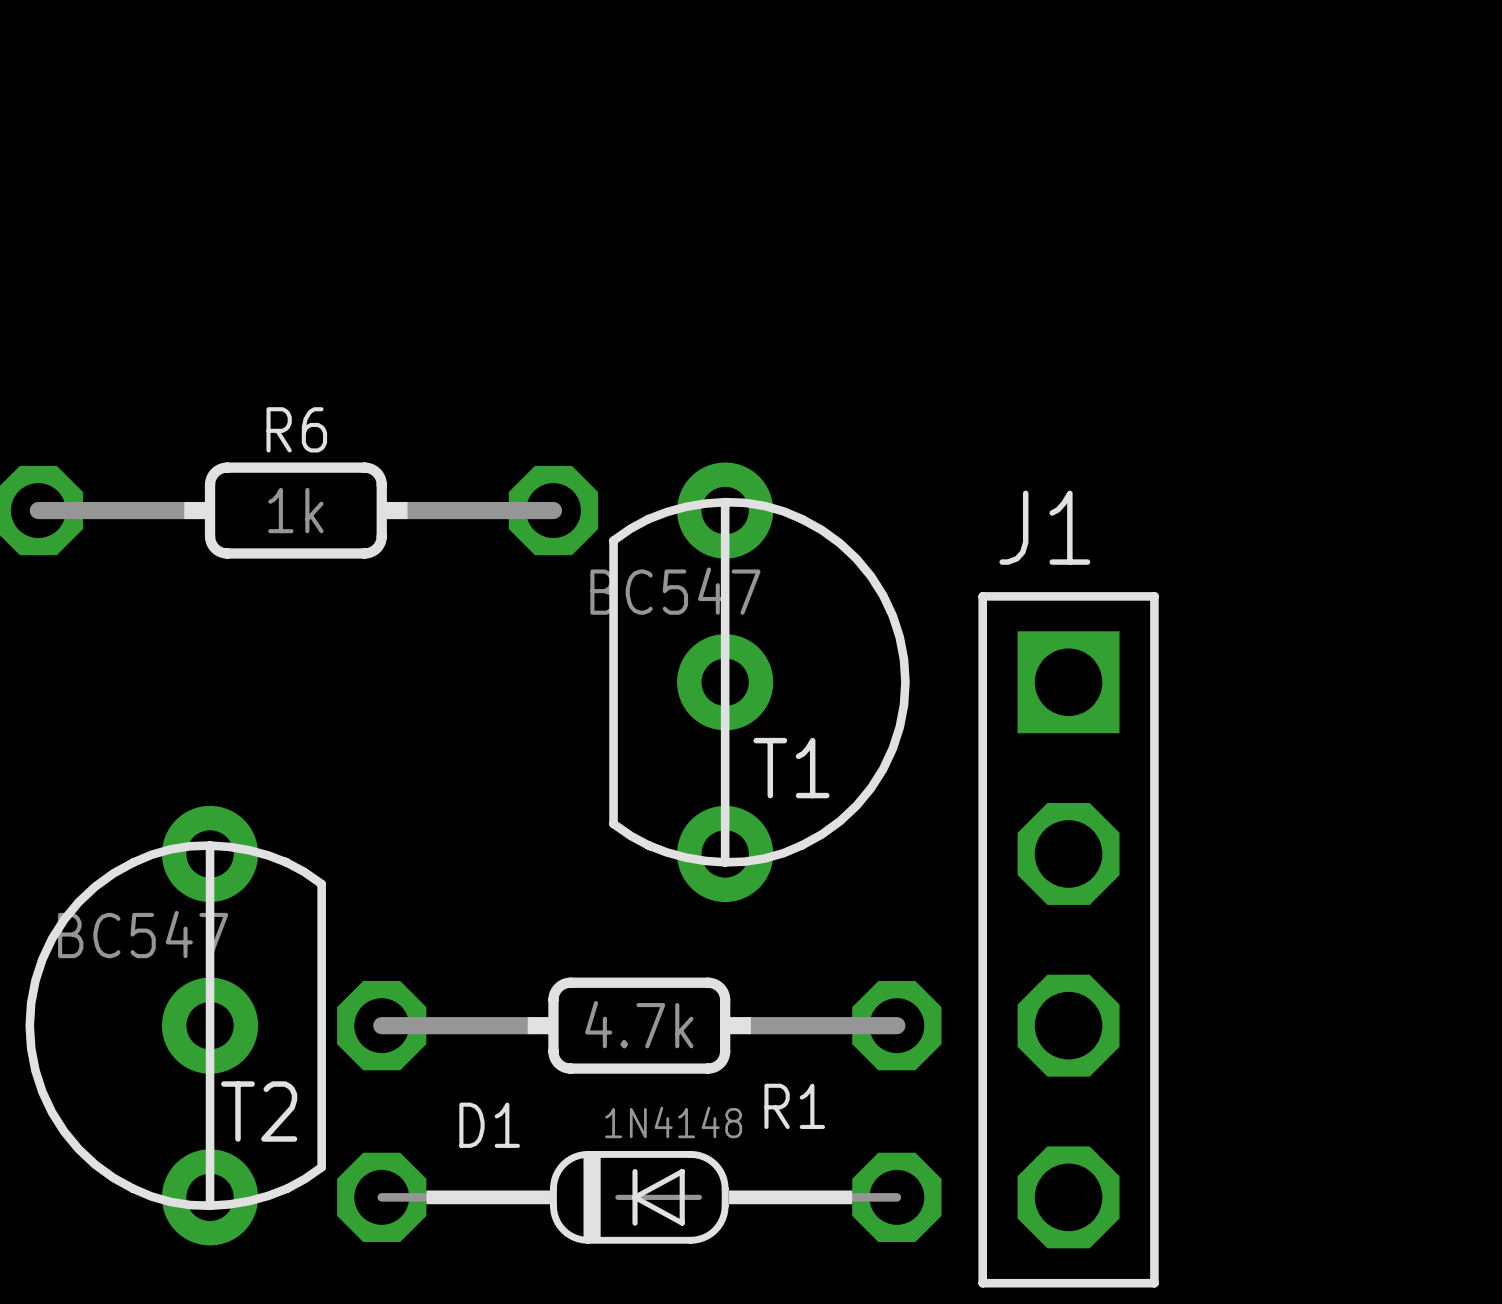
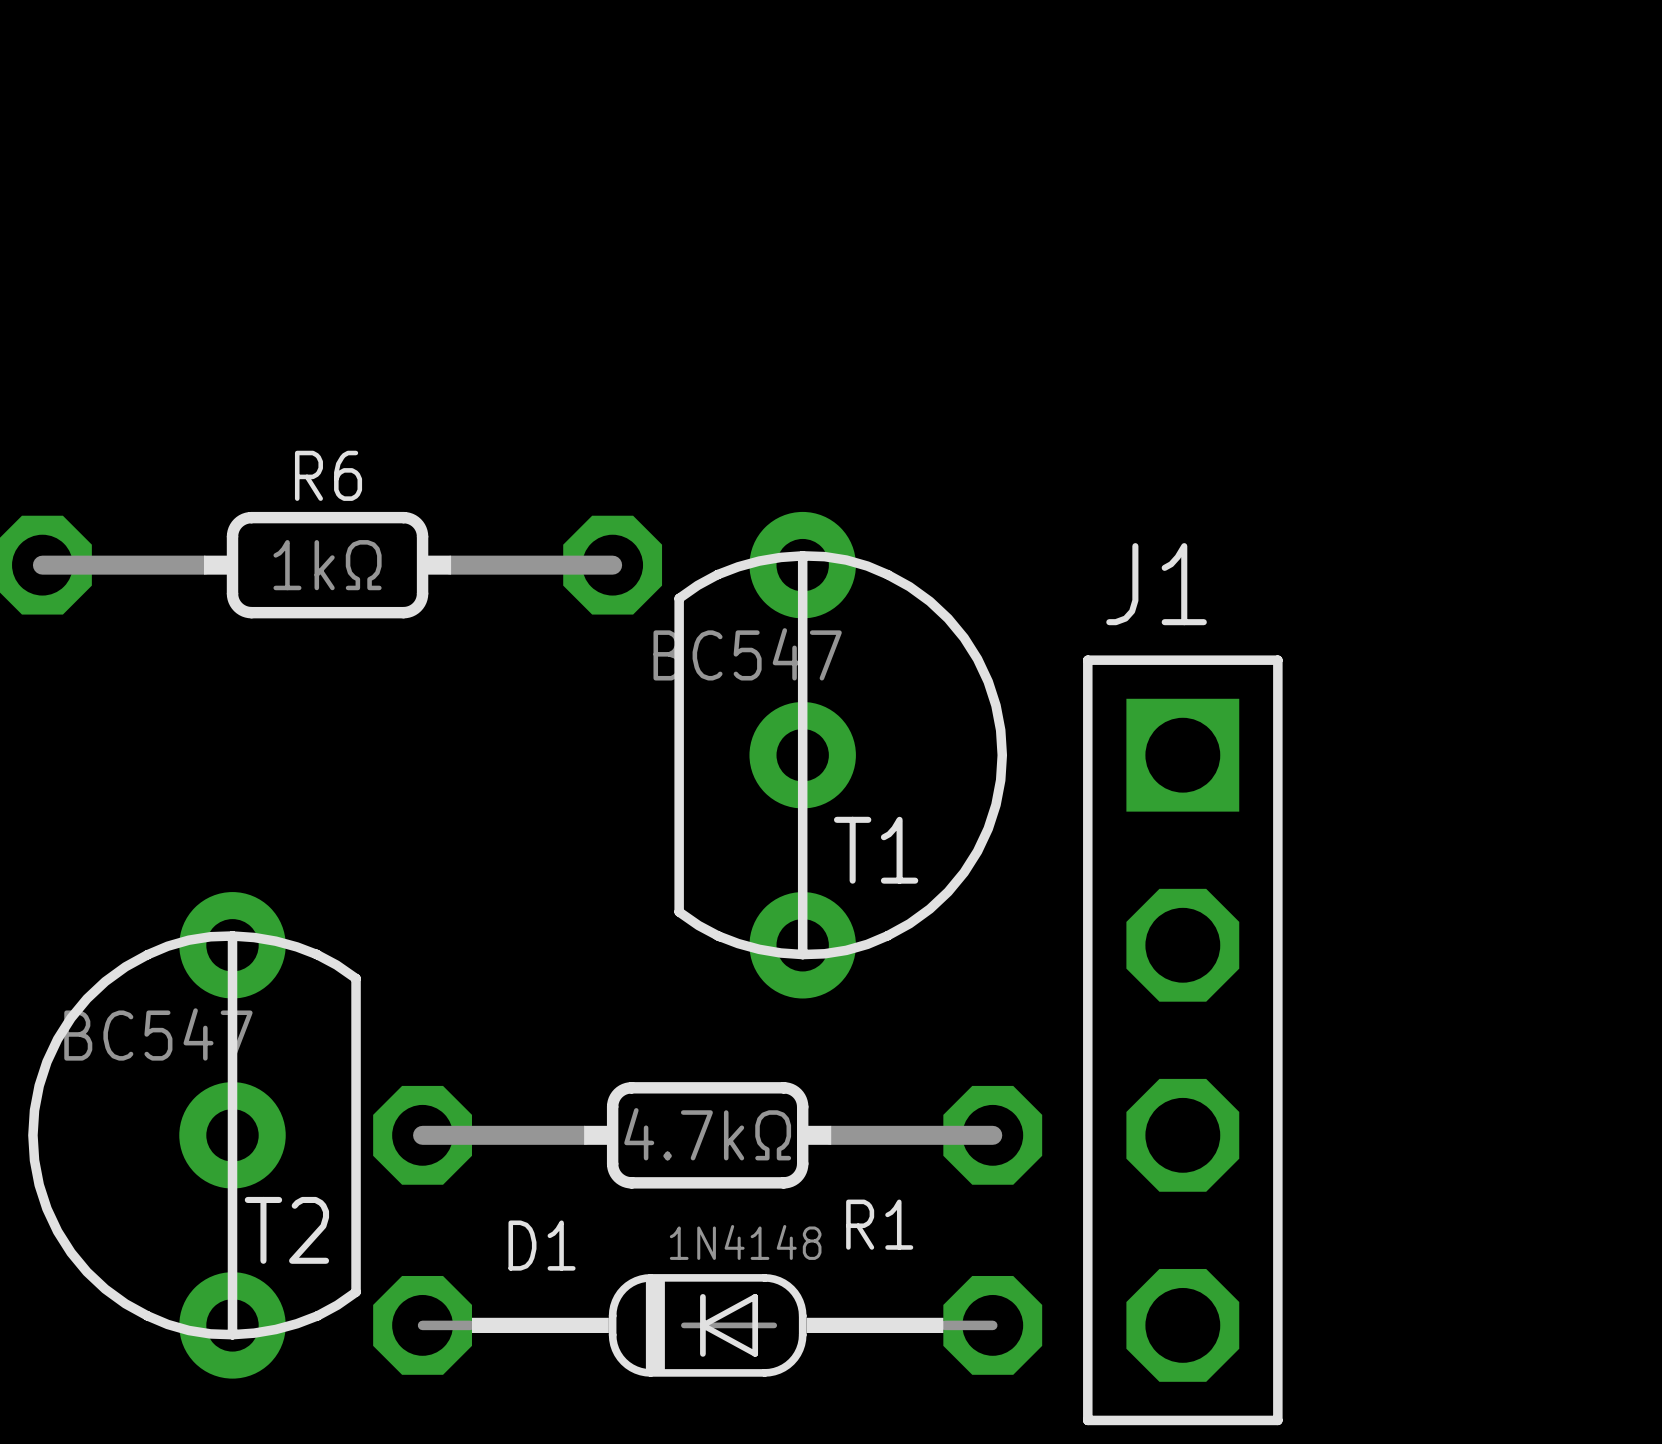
R6 value: 1k (295, 510) -> 1kΩ (327, 565)
R1 value: 4.7k (639, 1024) -> 4.7kΩ (707, 1134)

